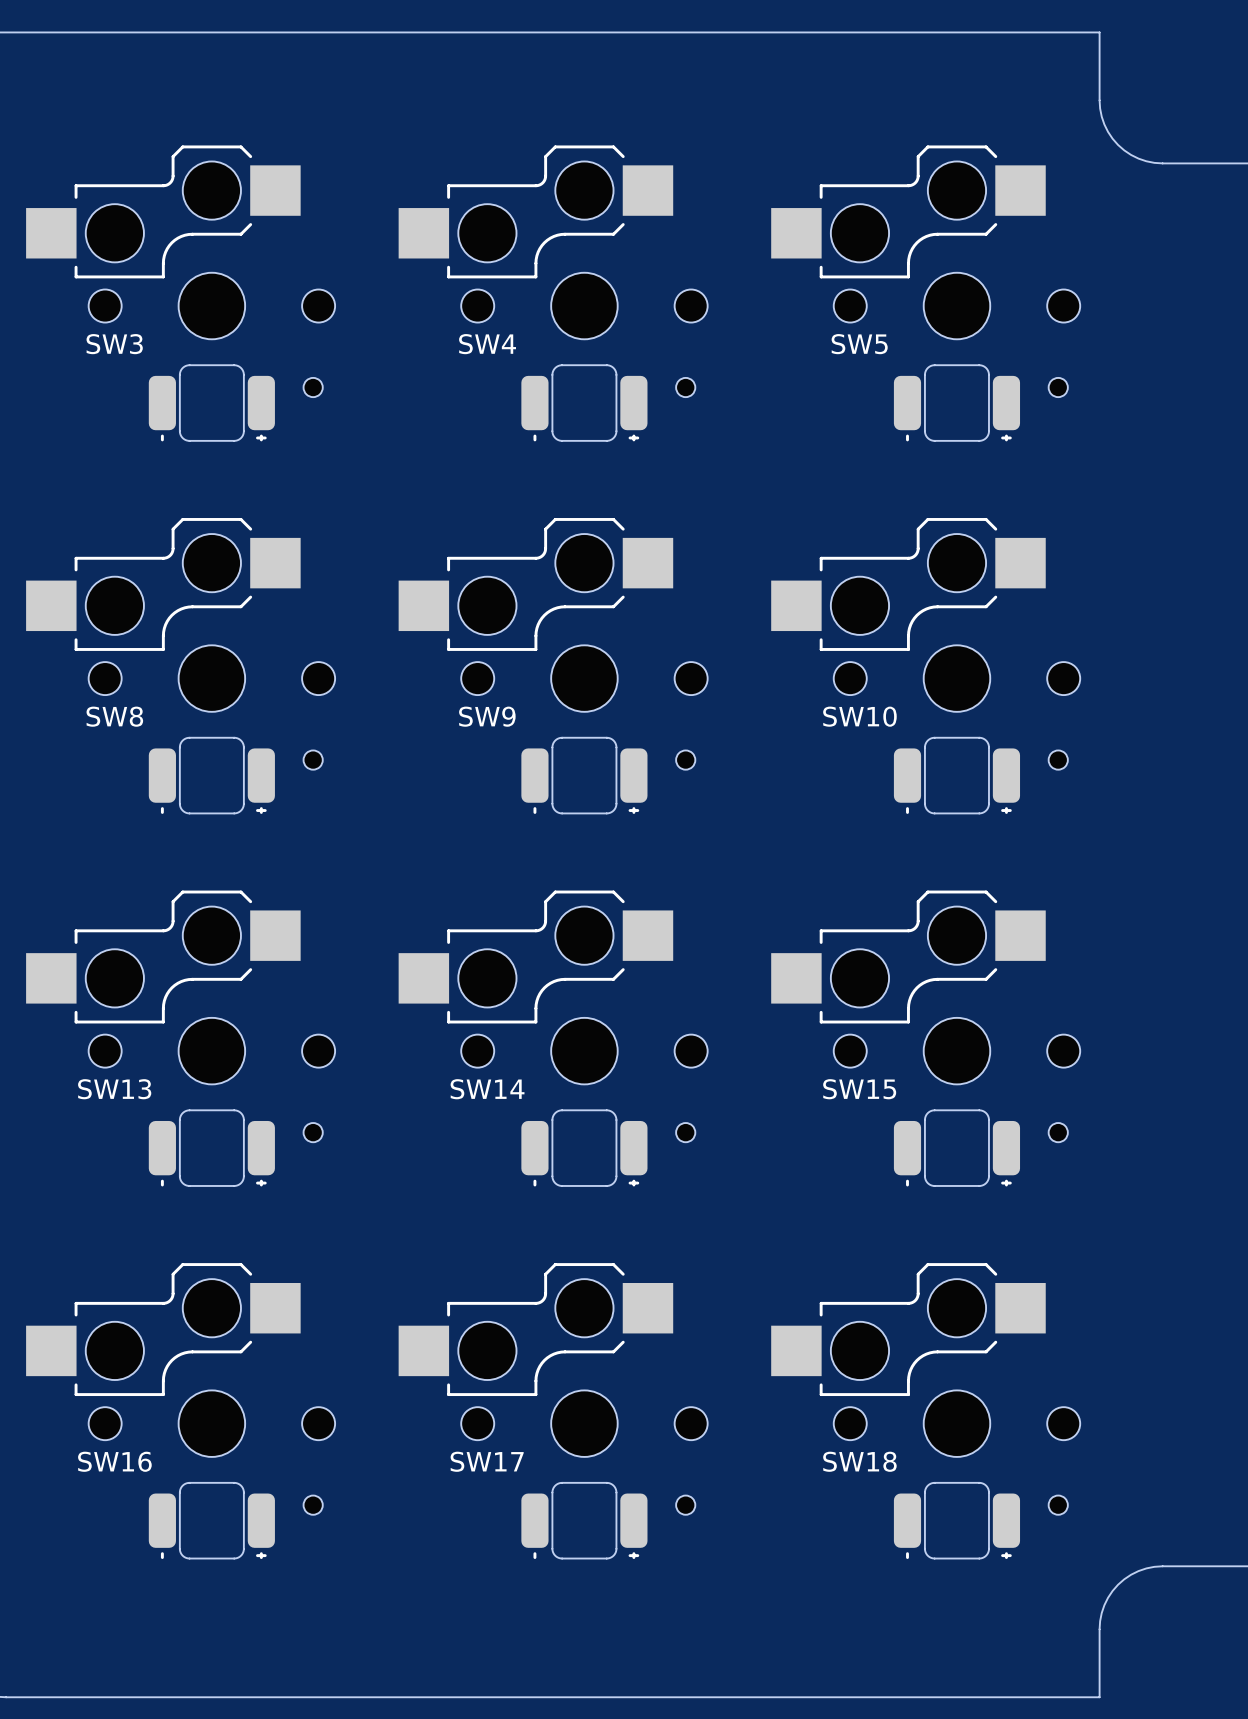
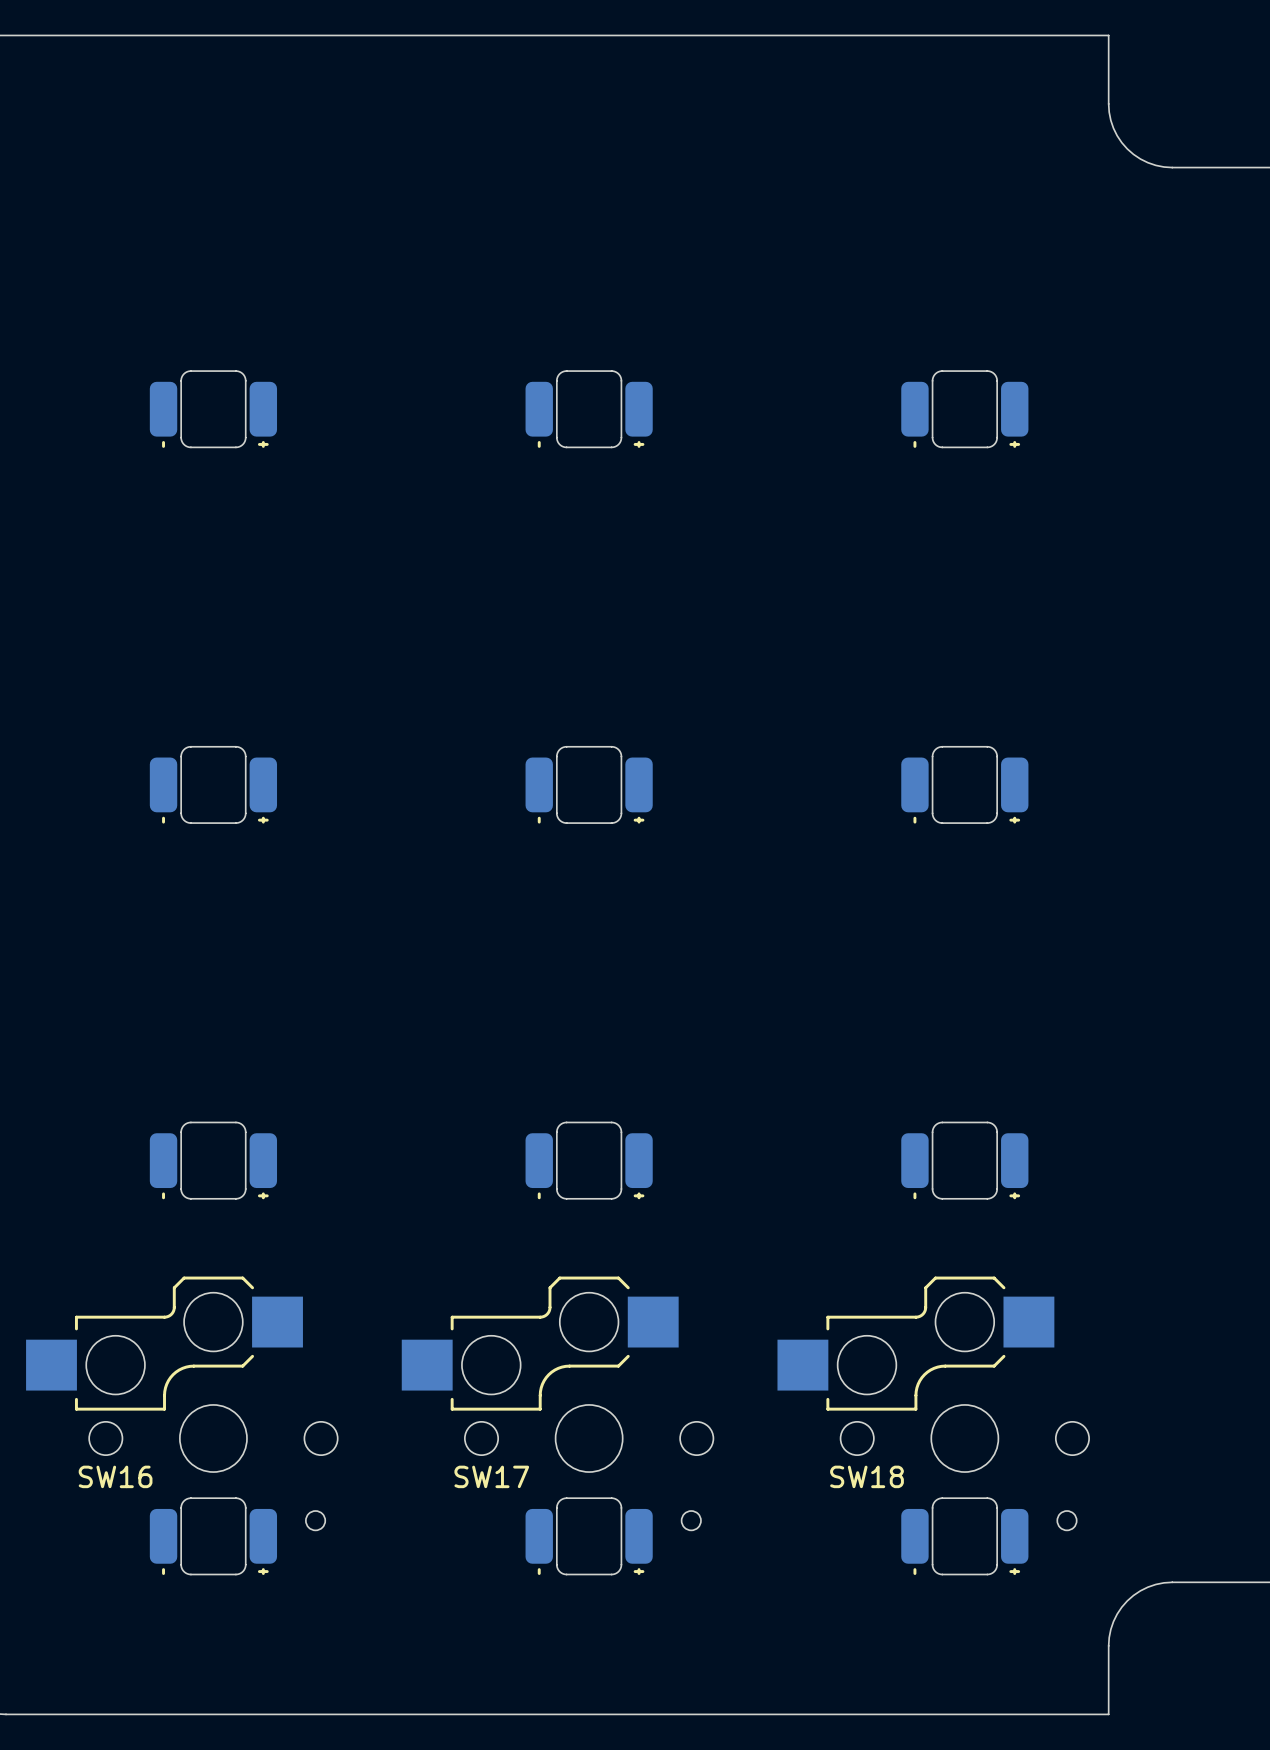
SW3: (180, 271) -> none
SW4: (553, 271) -> none
SW5: (925, 271) -> none
SW8: (180, 643) -> none
SW9: (553, 643) -> none
SW10: (925, 643) -> none
SW13: (180, 1016) -> none
SW14: (553, 1016) -> none
SW15: (925, 1016) -> none

